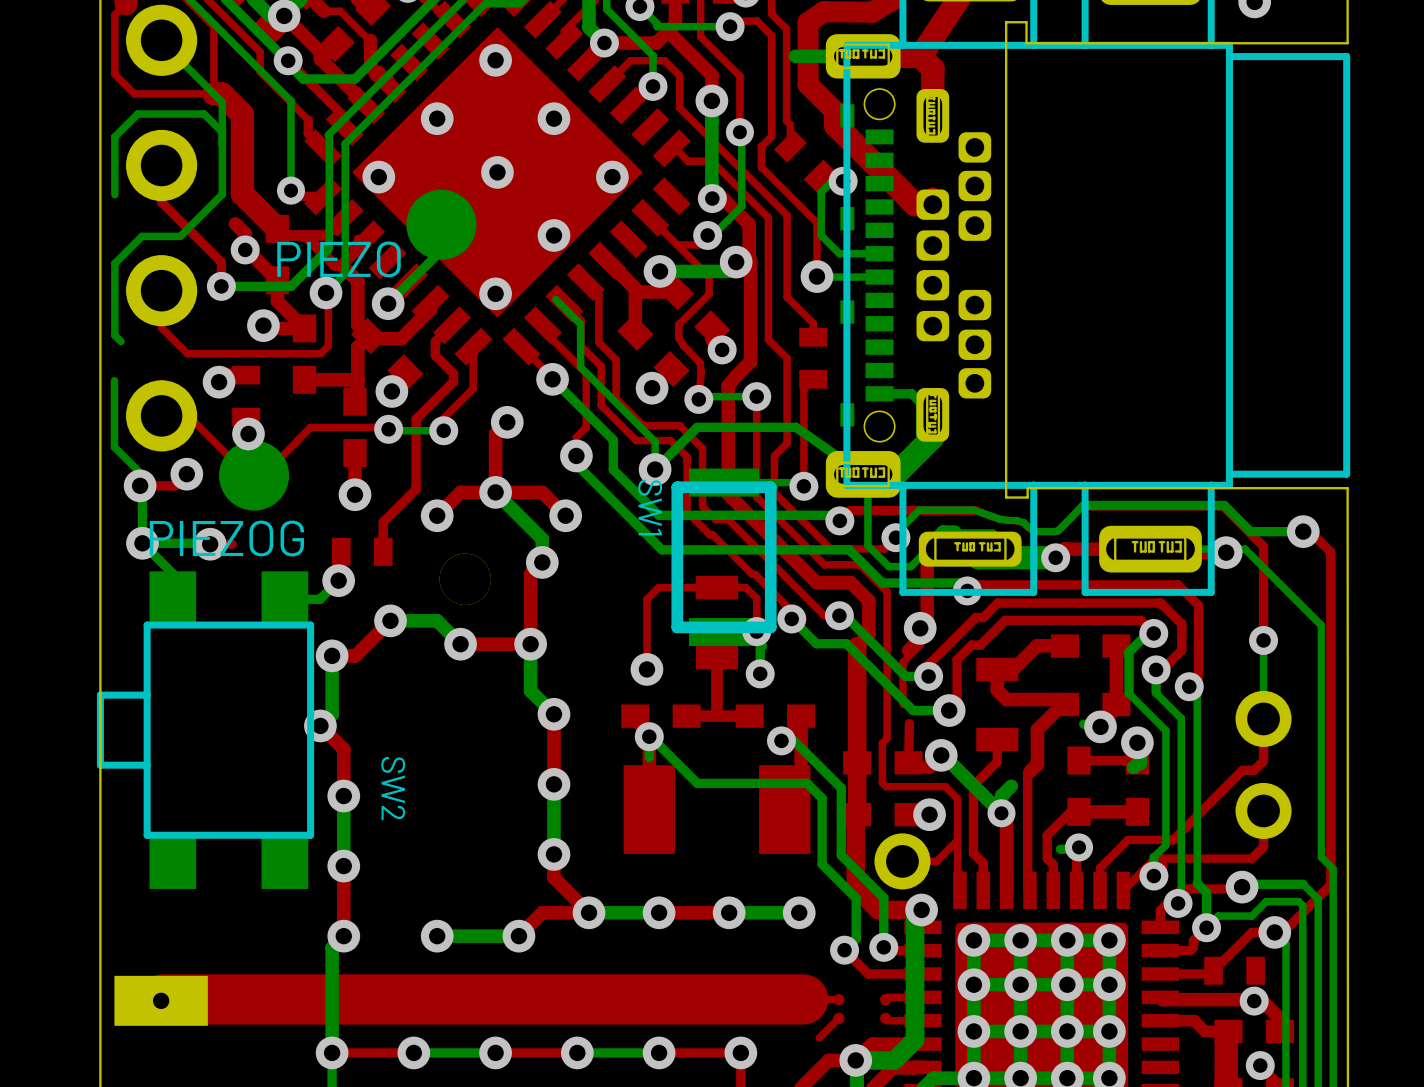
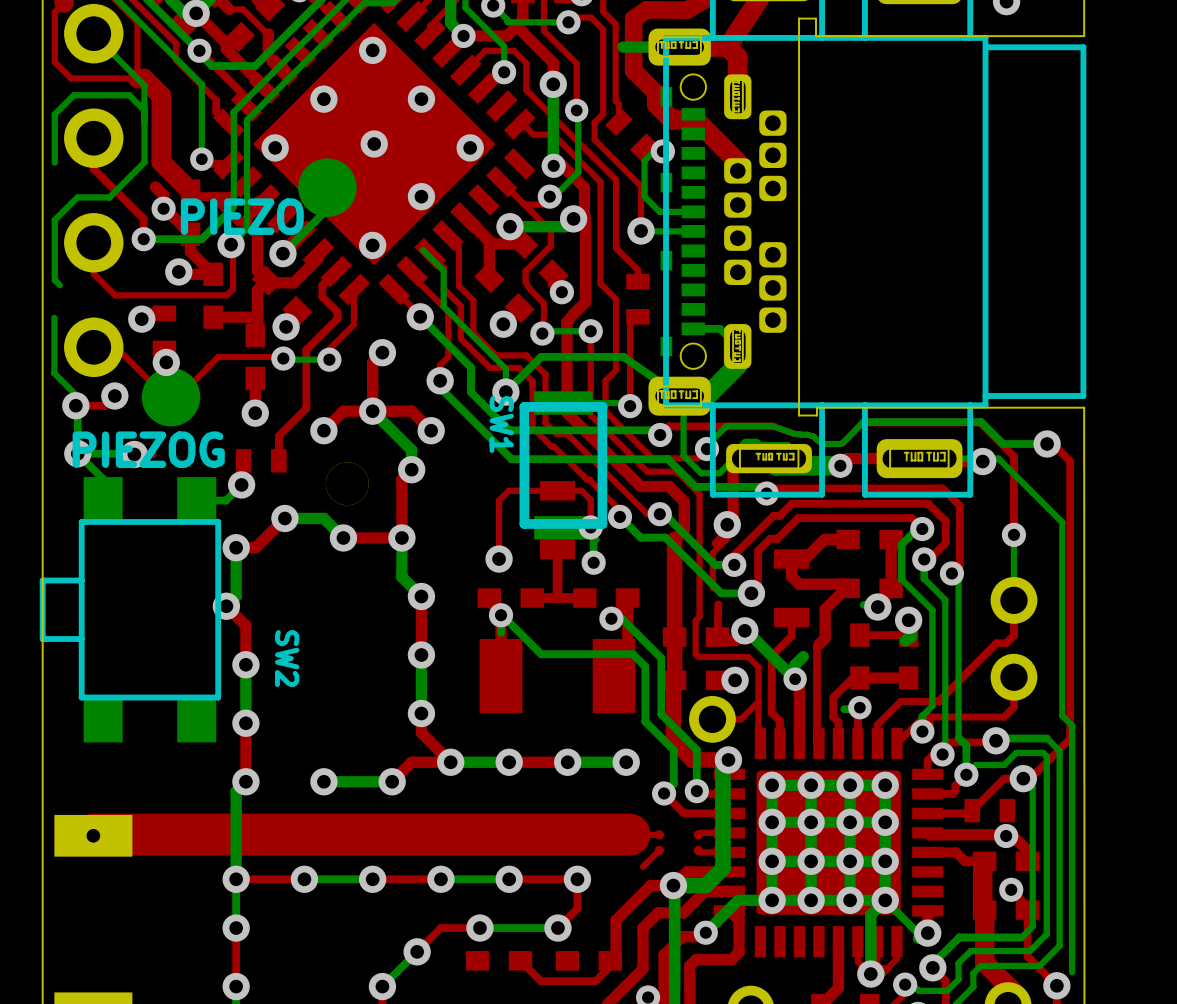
top track: (853, 143) (915, 204) (932, 204) -> (671, 119) (695, 119) (737, 161)

